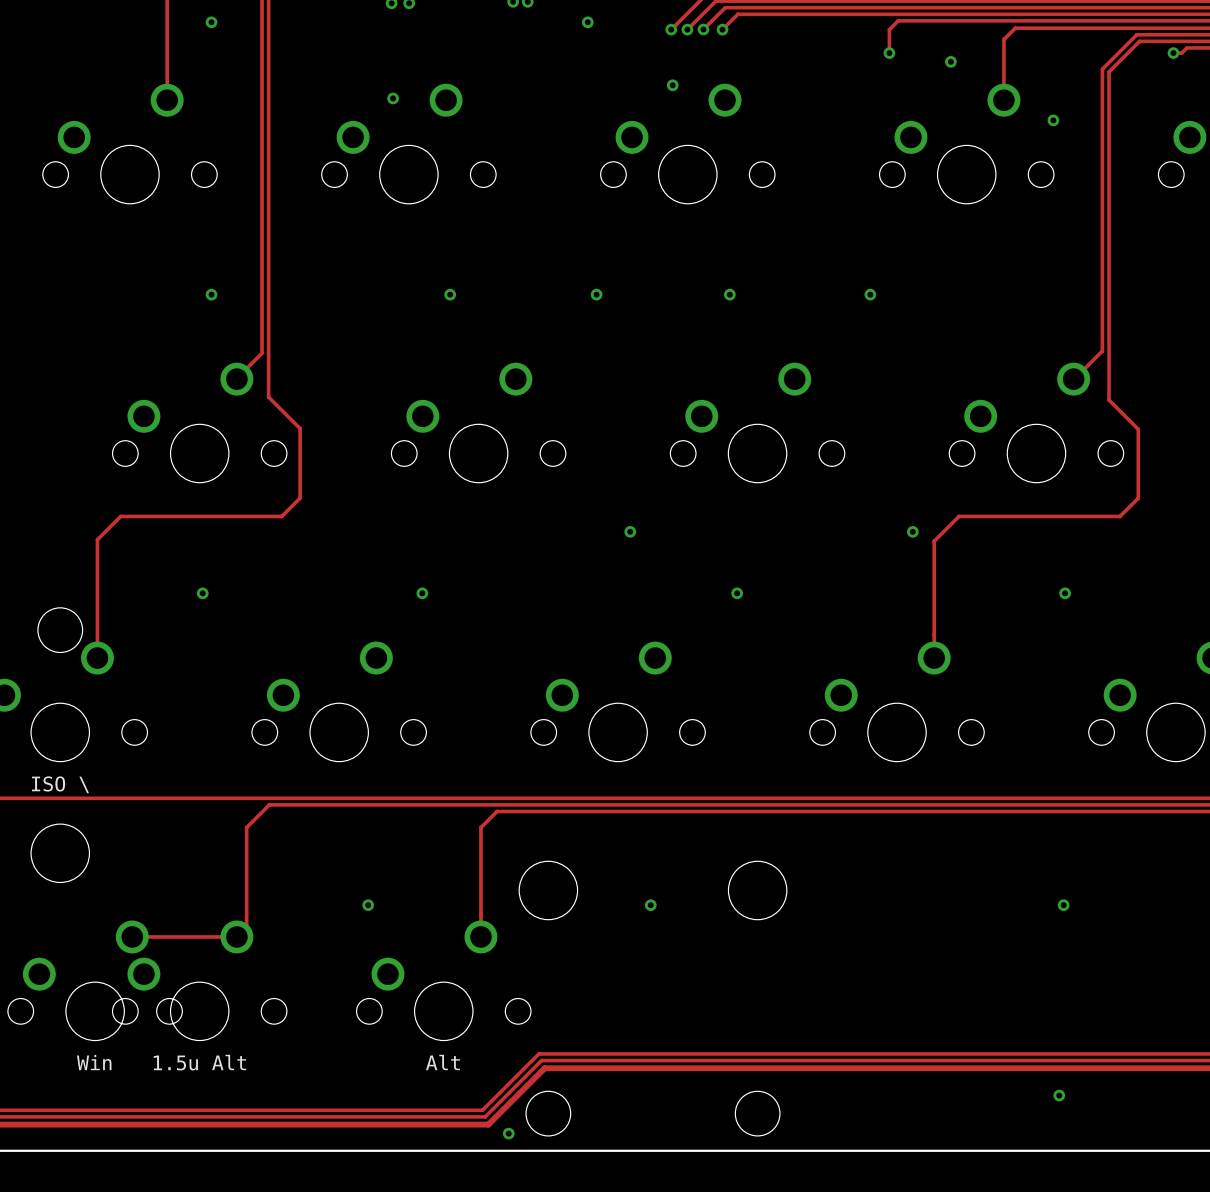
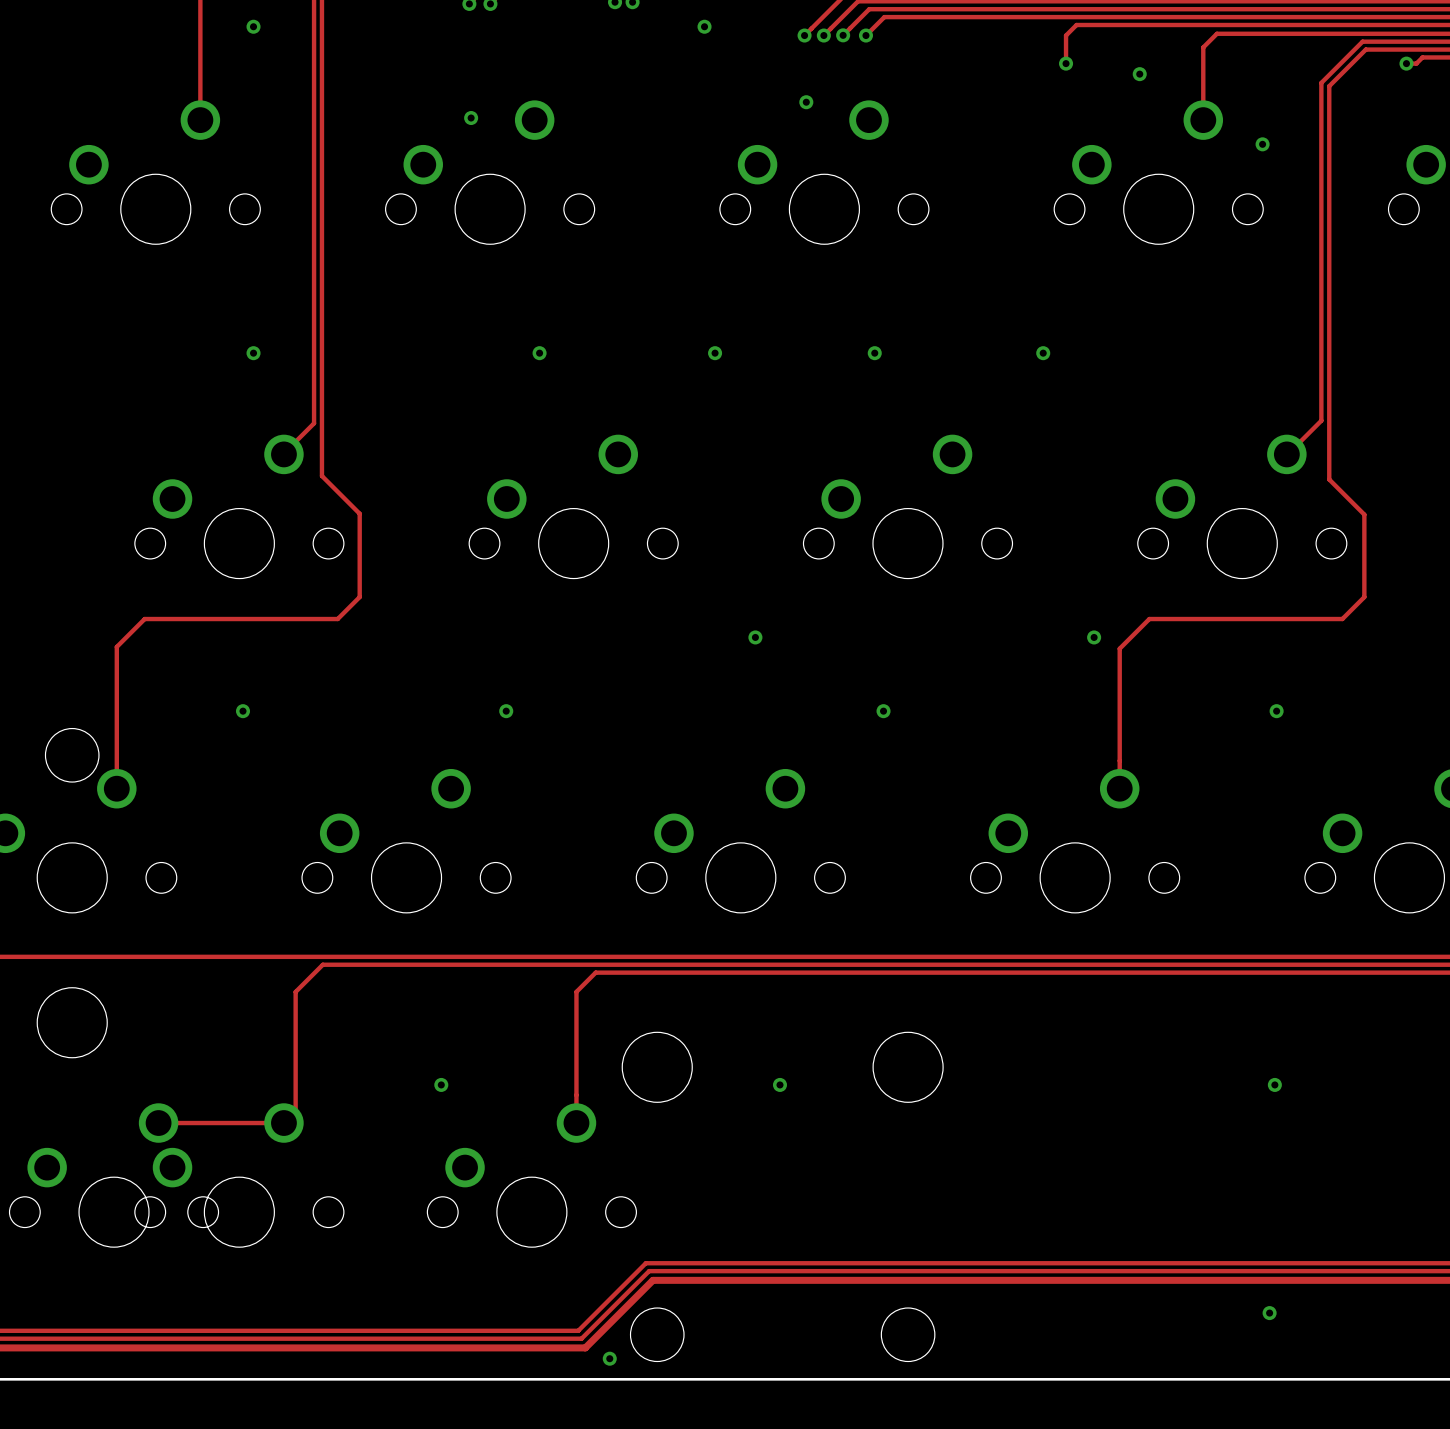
part value: ISO \ (60, 784) -> none
part value: Win (94, 1062) -> none
part value: 1.5u Alt (199, 1062) -> none
part value: Alt (442, 1062) -> none

